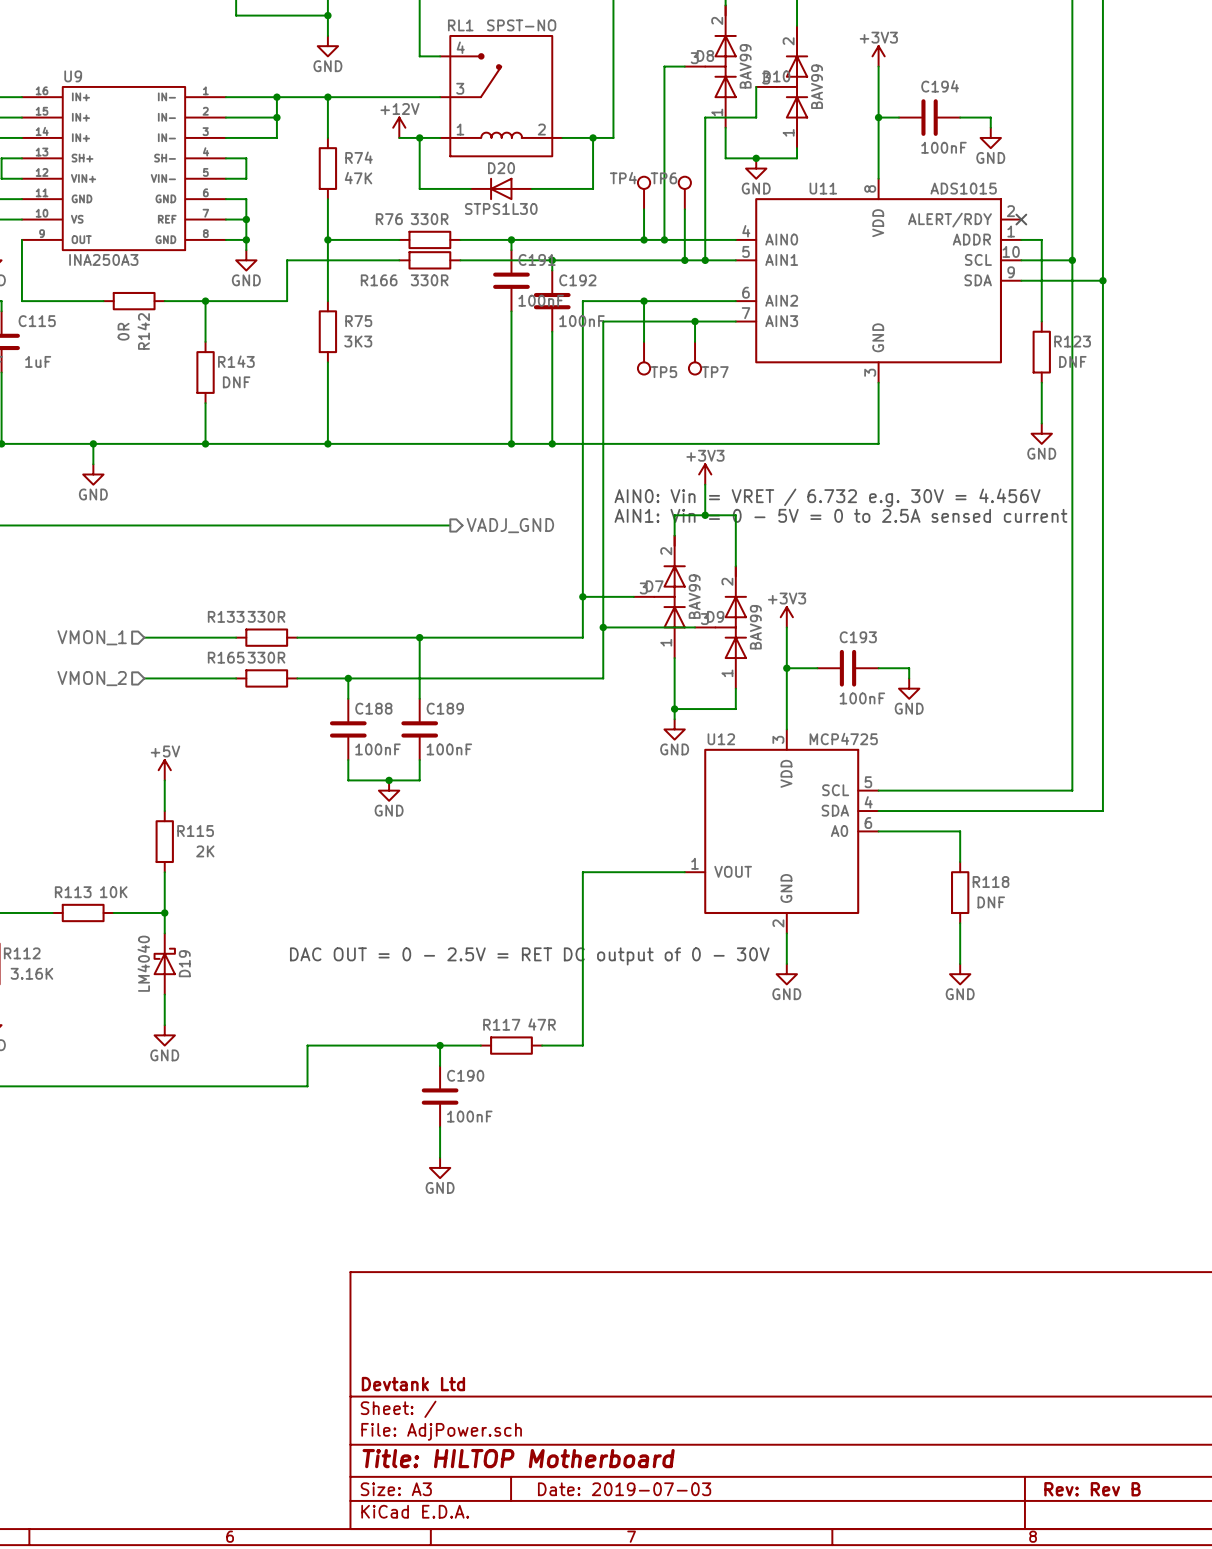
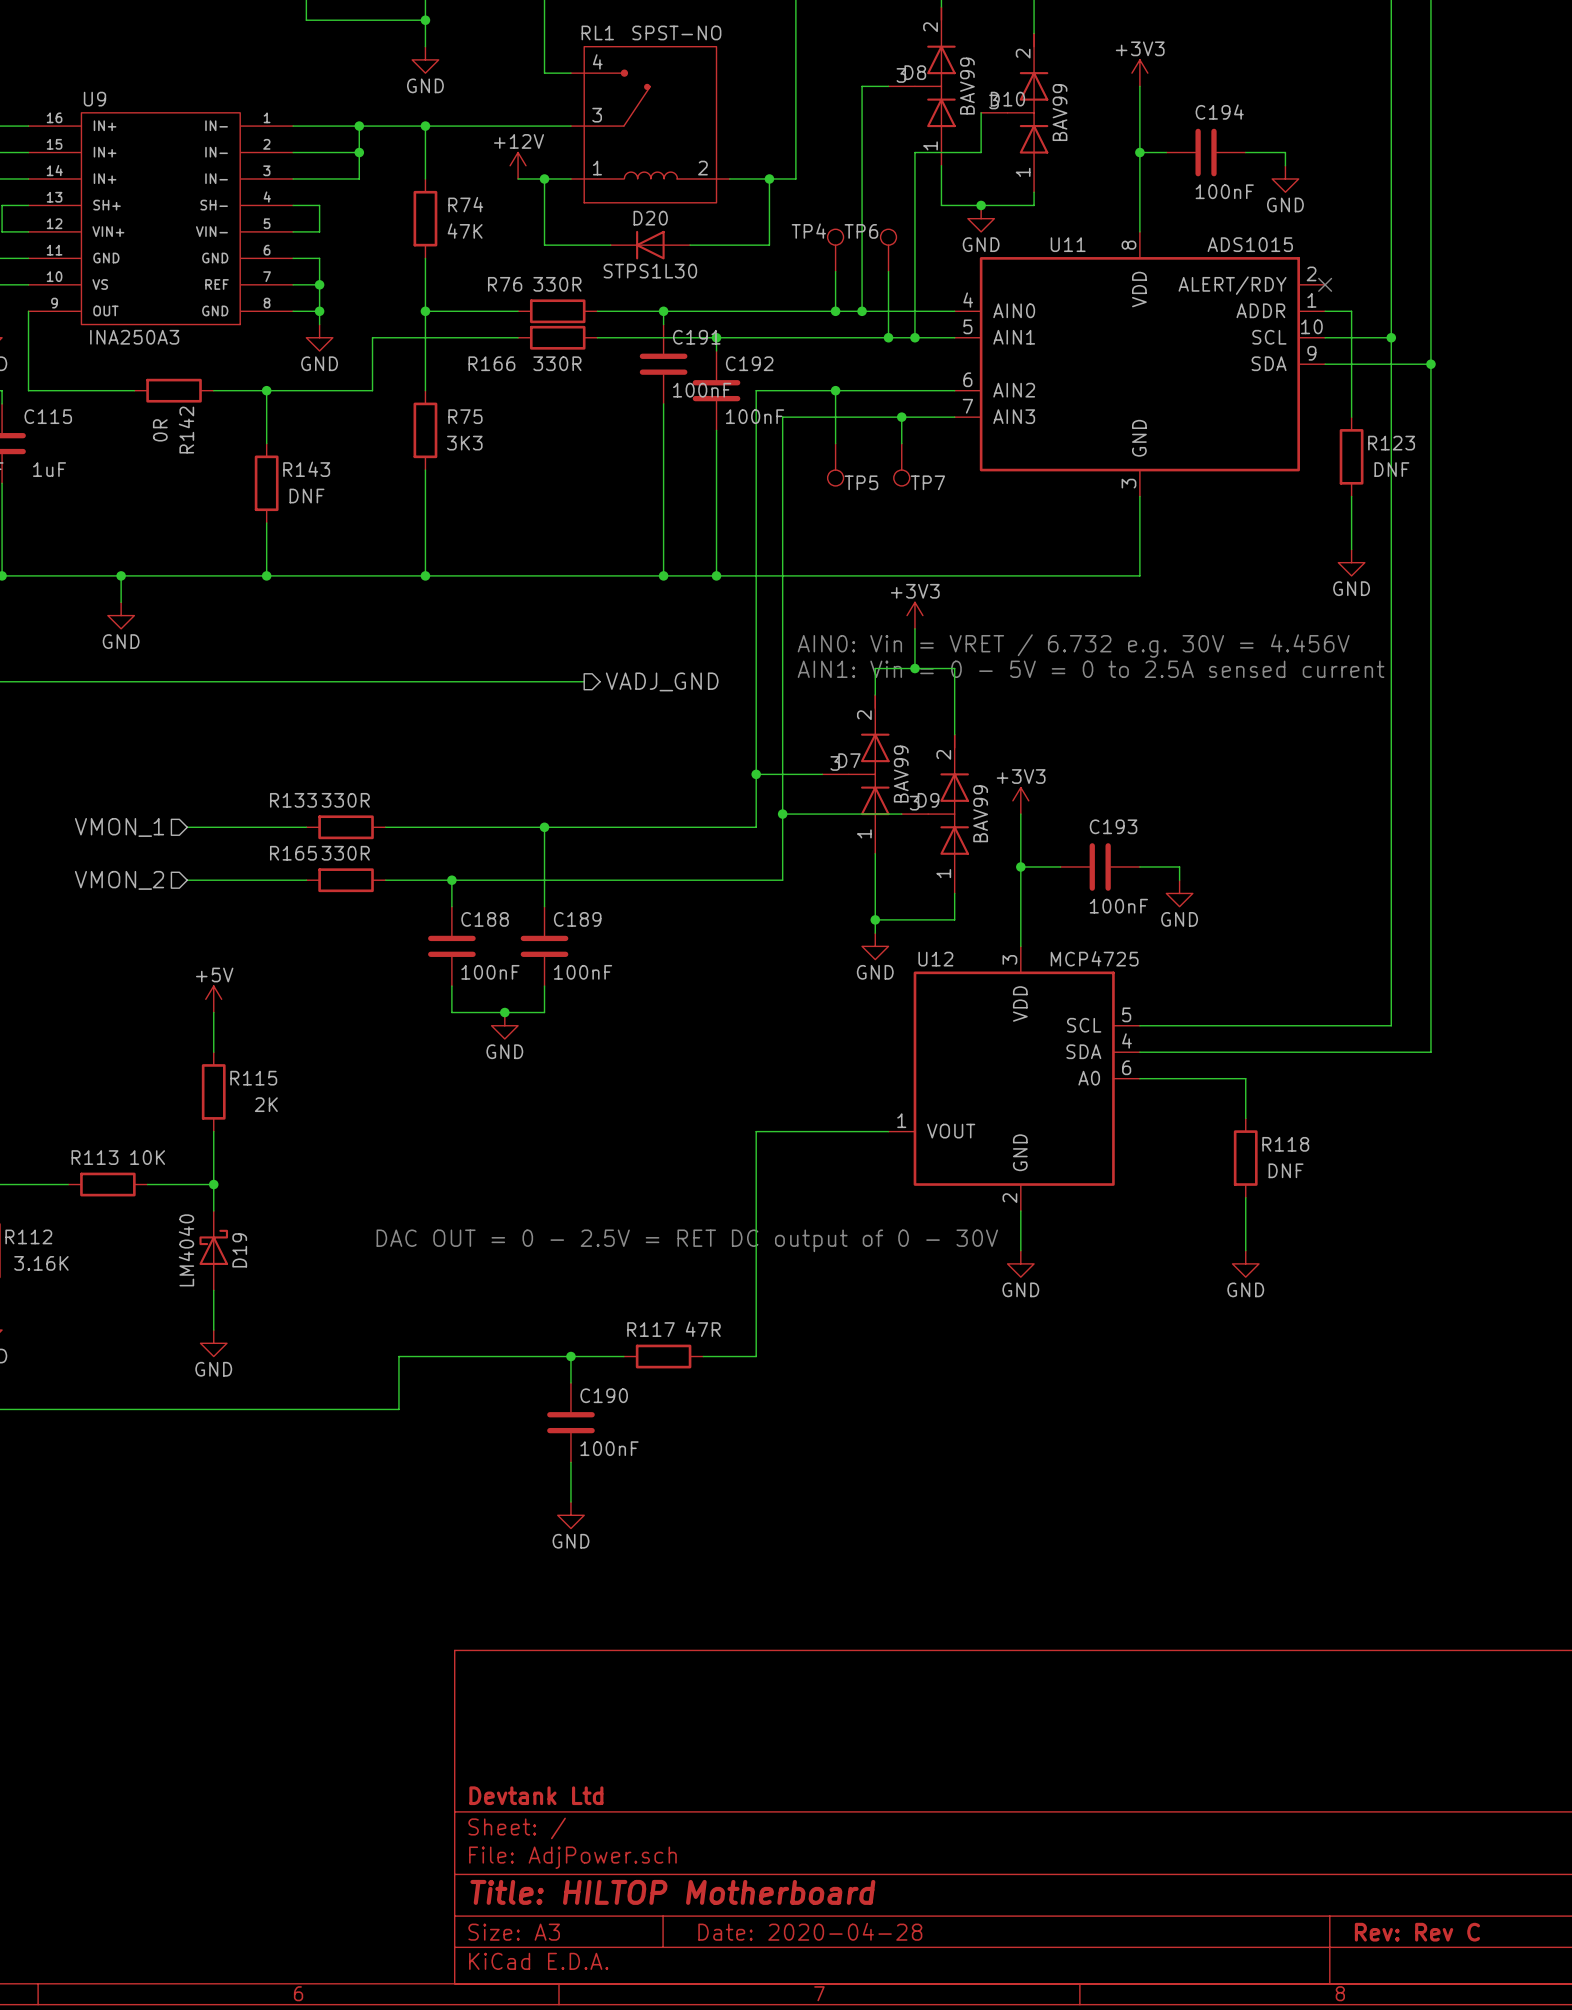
title block: Date: 2019-07-03 (624, 1489) -> Date: 2020-04-28 (810, 1931)
title block: Rev: Rev B (1092, 1489) -> Rev: Rev C (1417, 1932)

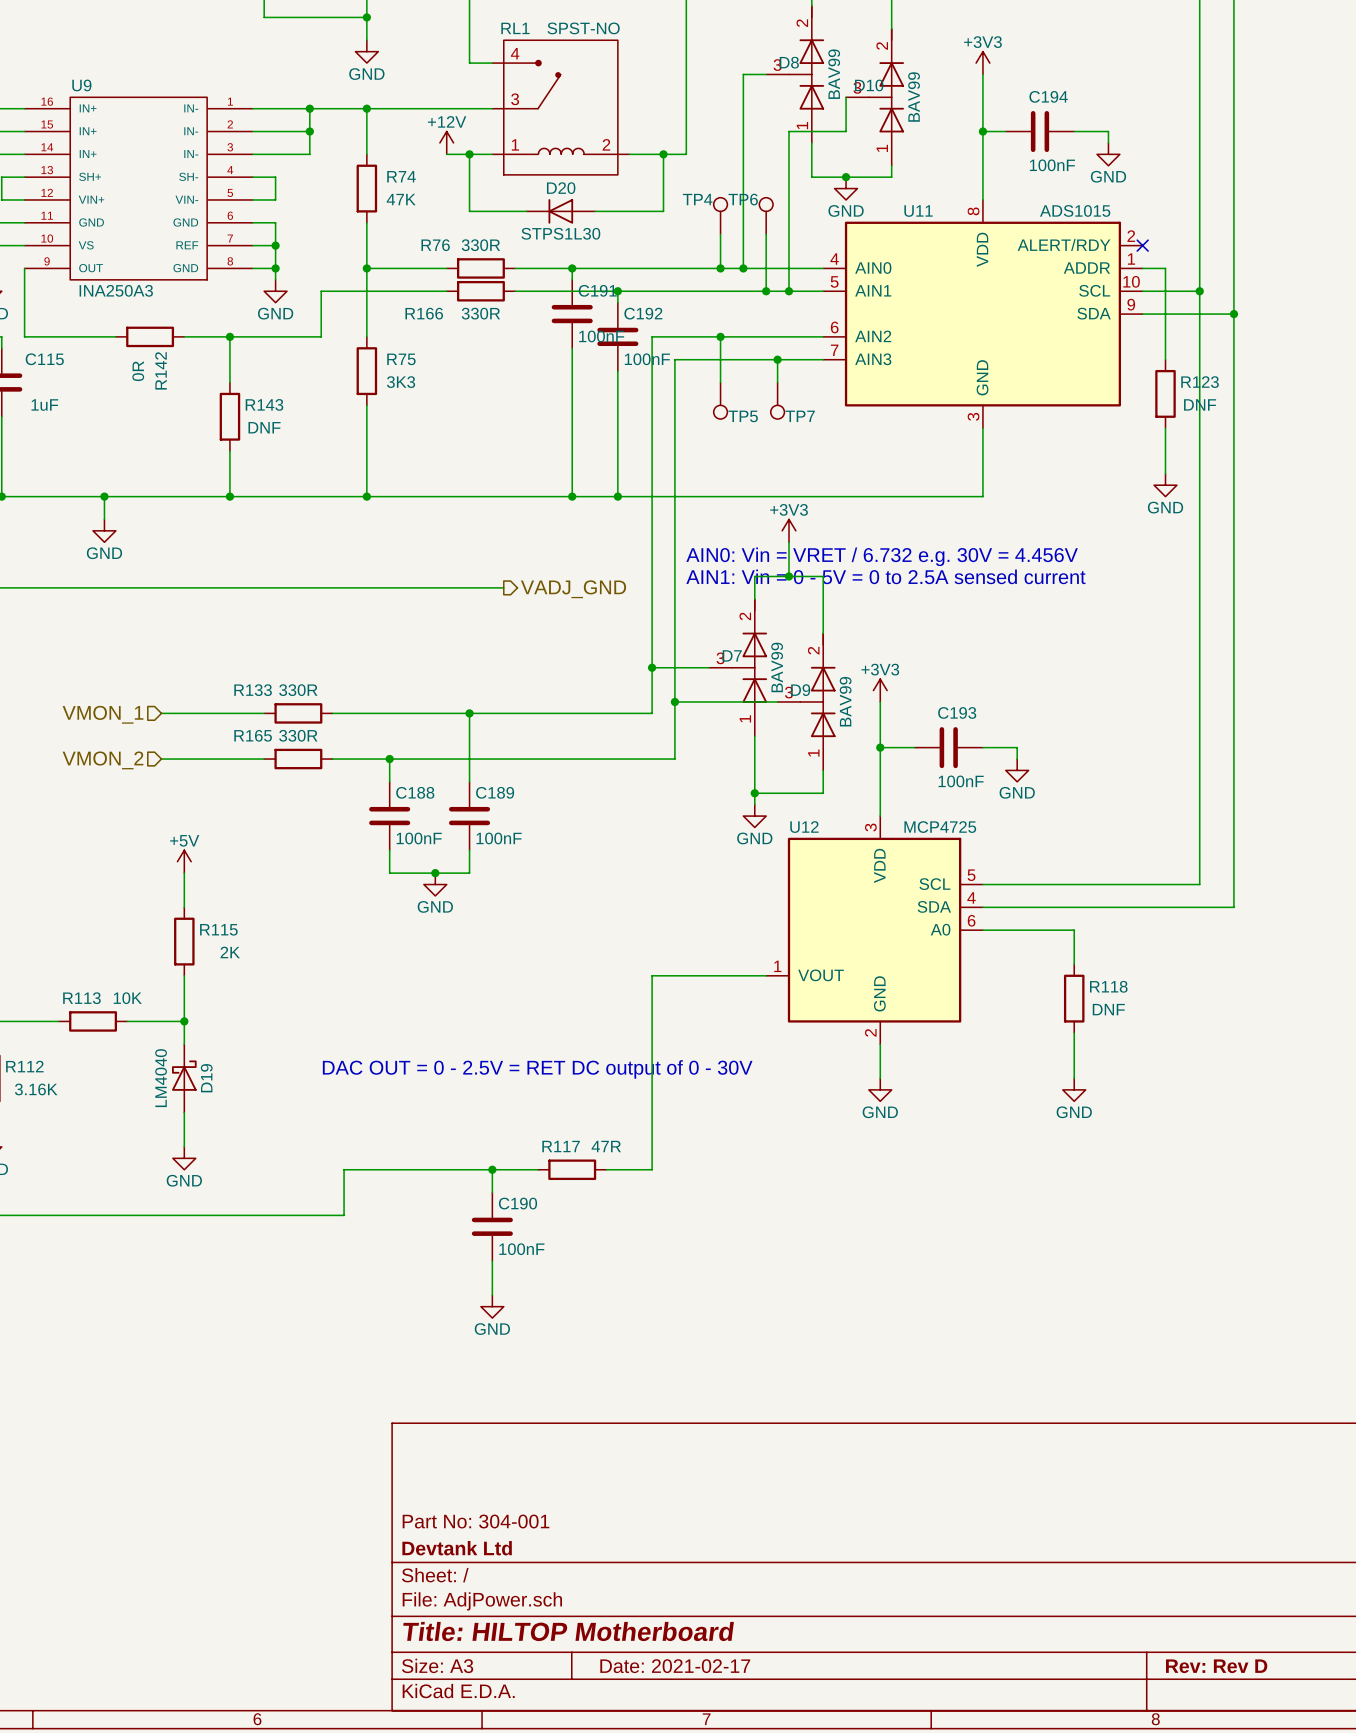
title block: none -> Part No: 304-001 (475, 1521)
title block: Date: 2020-04-28 (810, 1931) -> Date: 2021-02-17 (675, 1666)
title block: Rev: Rev C (1417, 1932) -> Rev: Rev D (1216, 1666)

